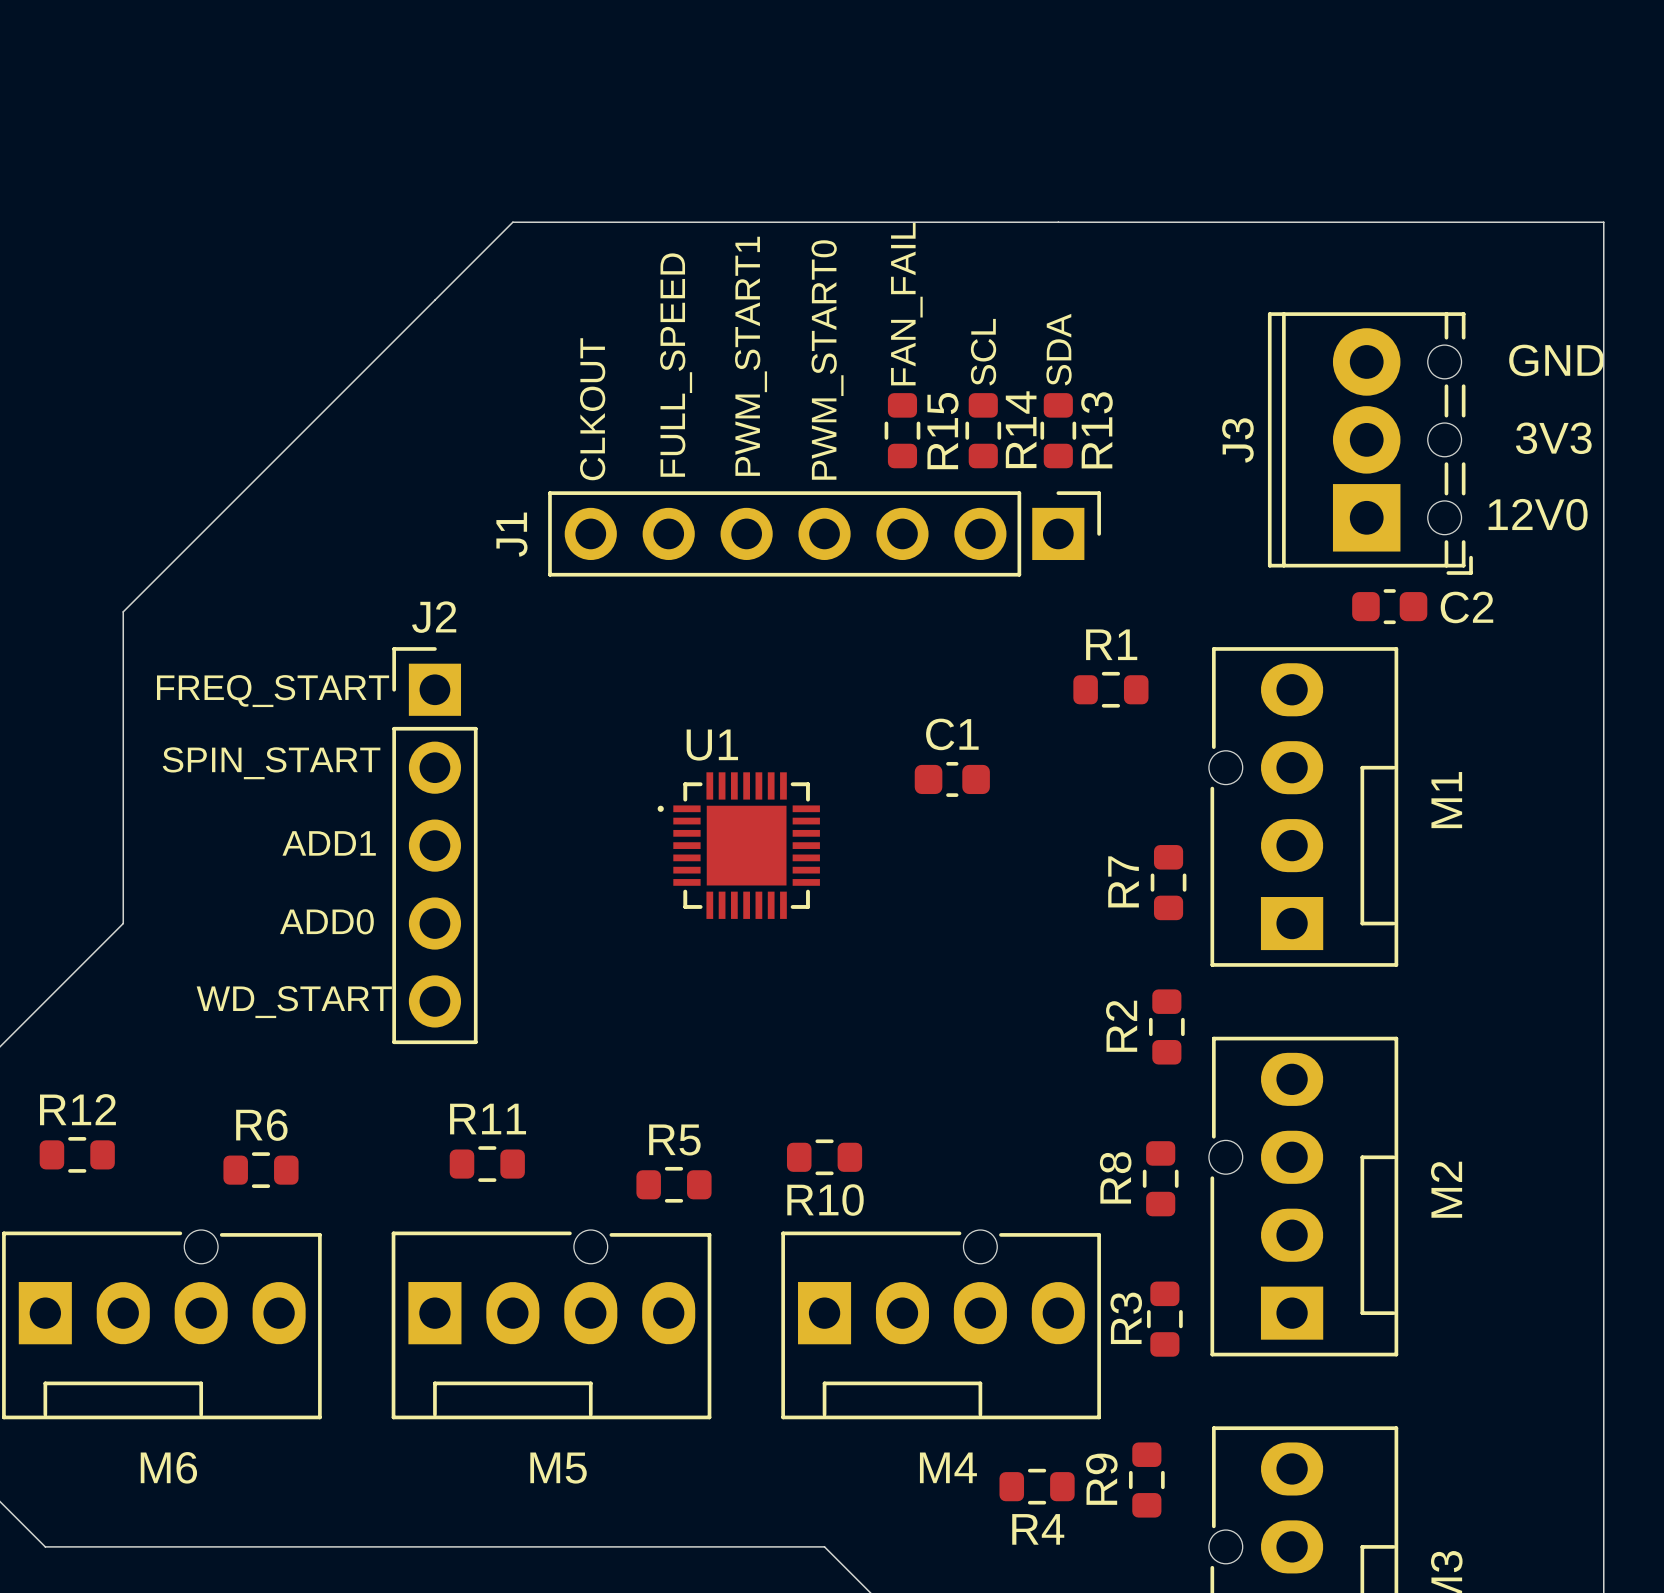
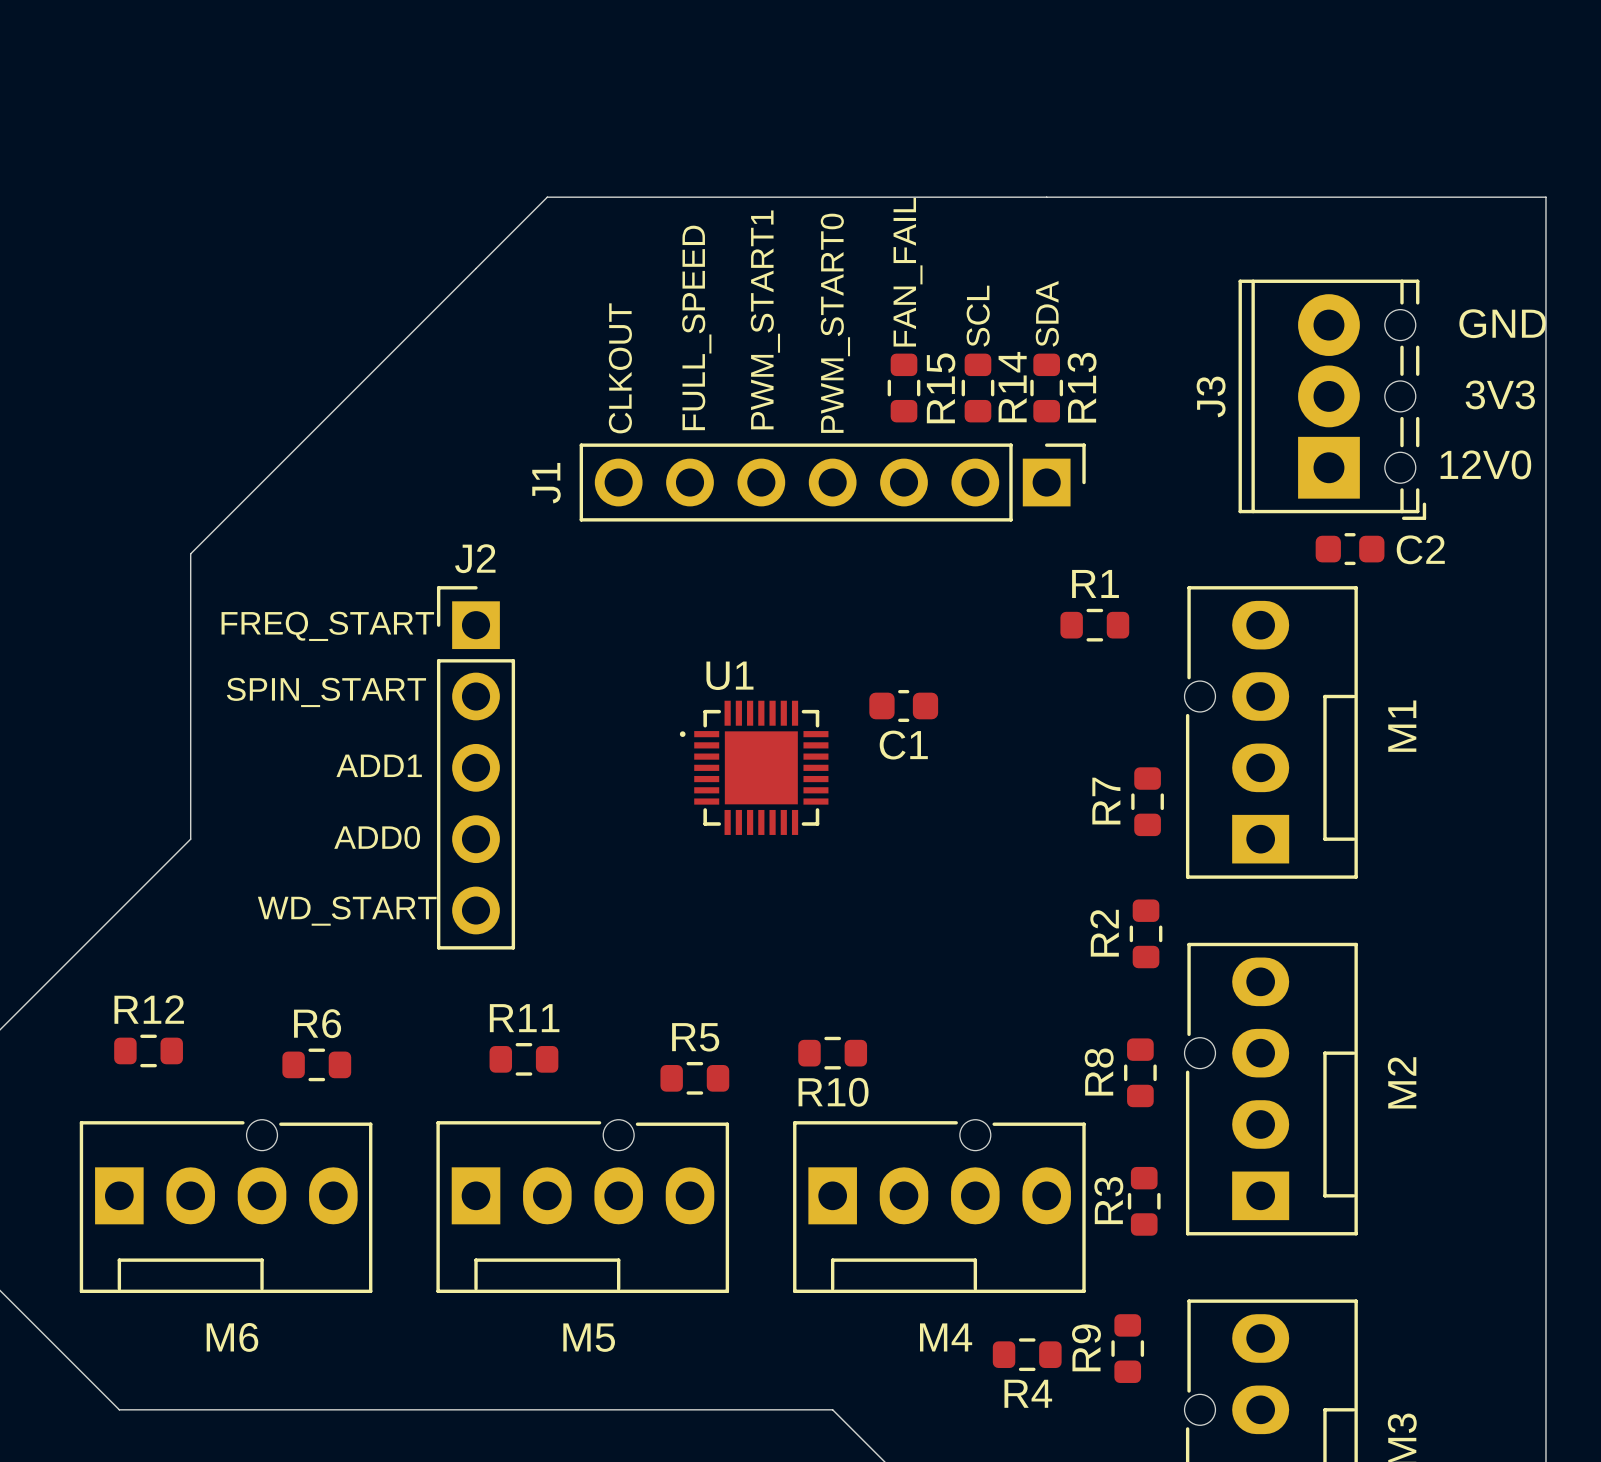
C1 name position: C1 (952, 734) -> C1 (903, 745)
C1 position: (952, 779) -> (903, 705)

